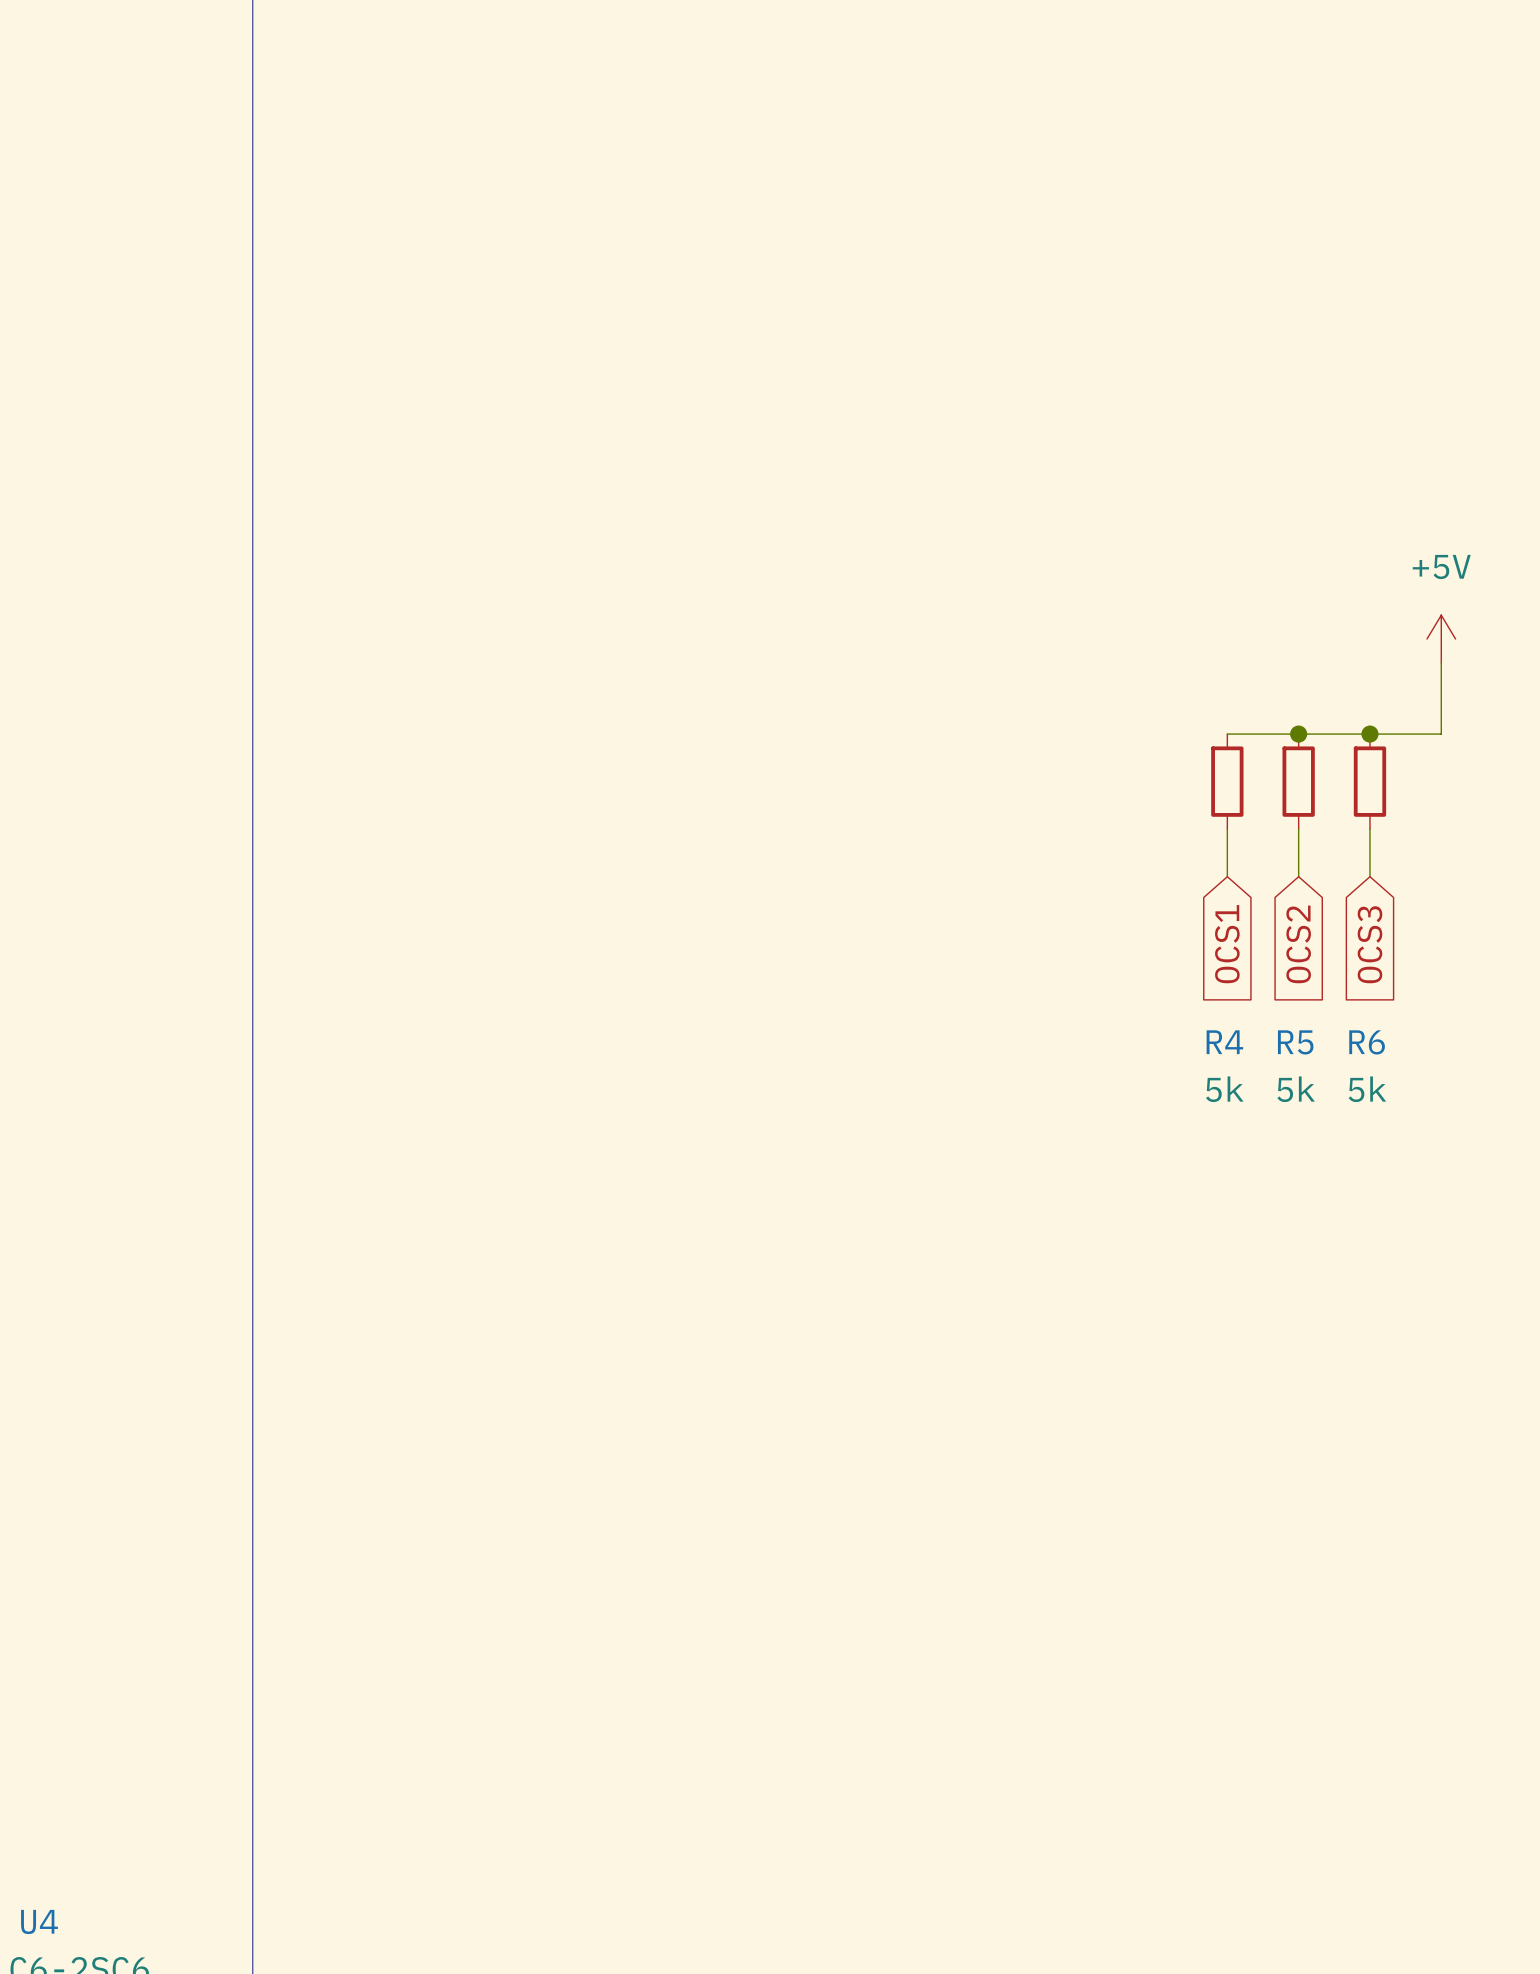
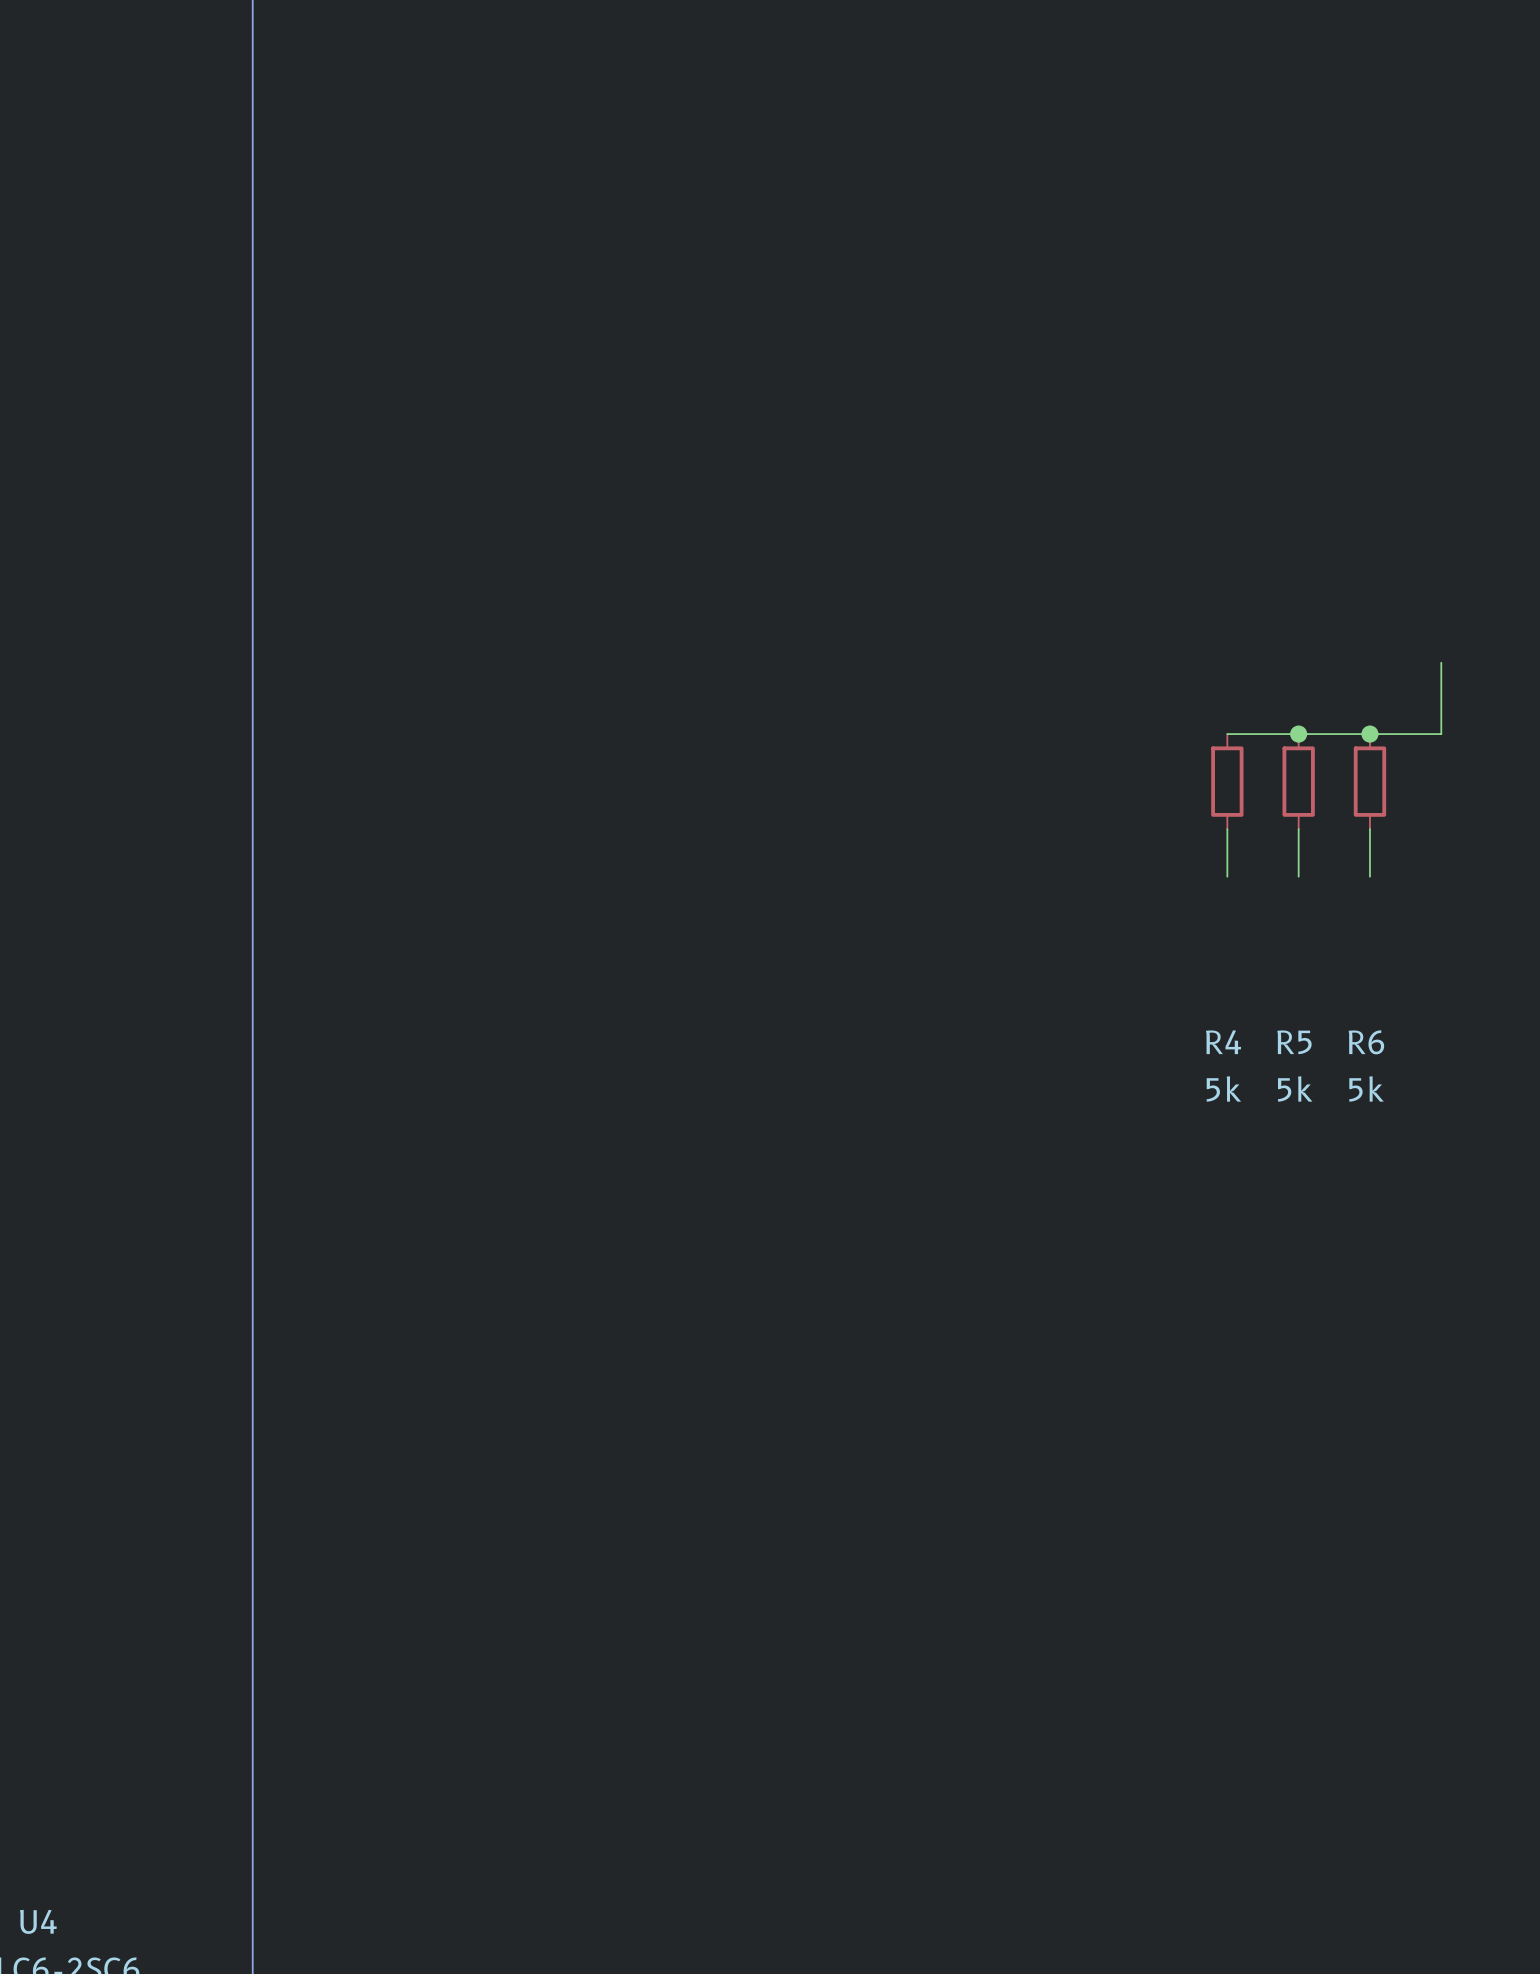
power symbol: +5V (1441, 638) -> none
global label: OCS1 (1227, 944) -> none
global label: OCS2 (1298, 944) -> none
global label: OCS3 (1369, 944) -> none

